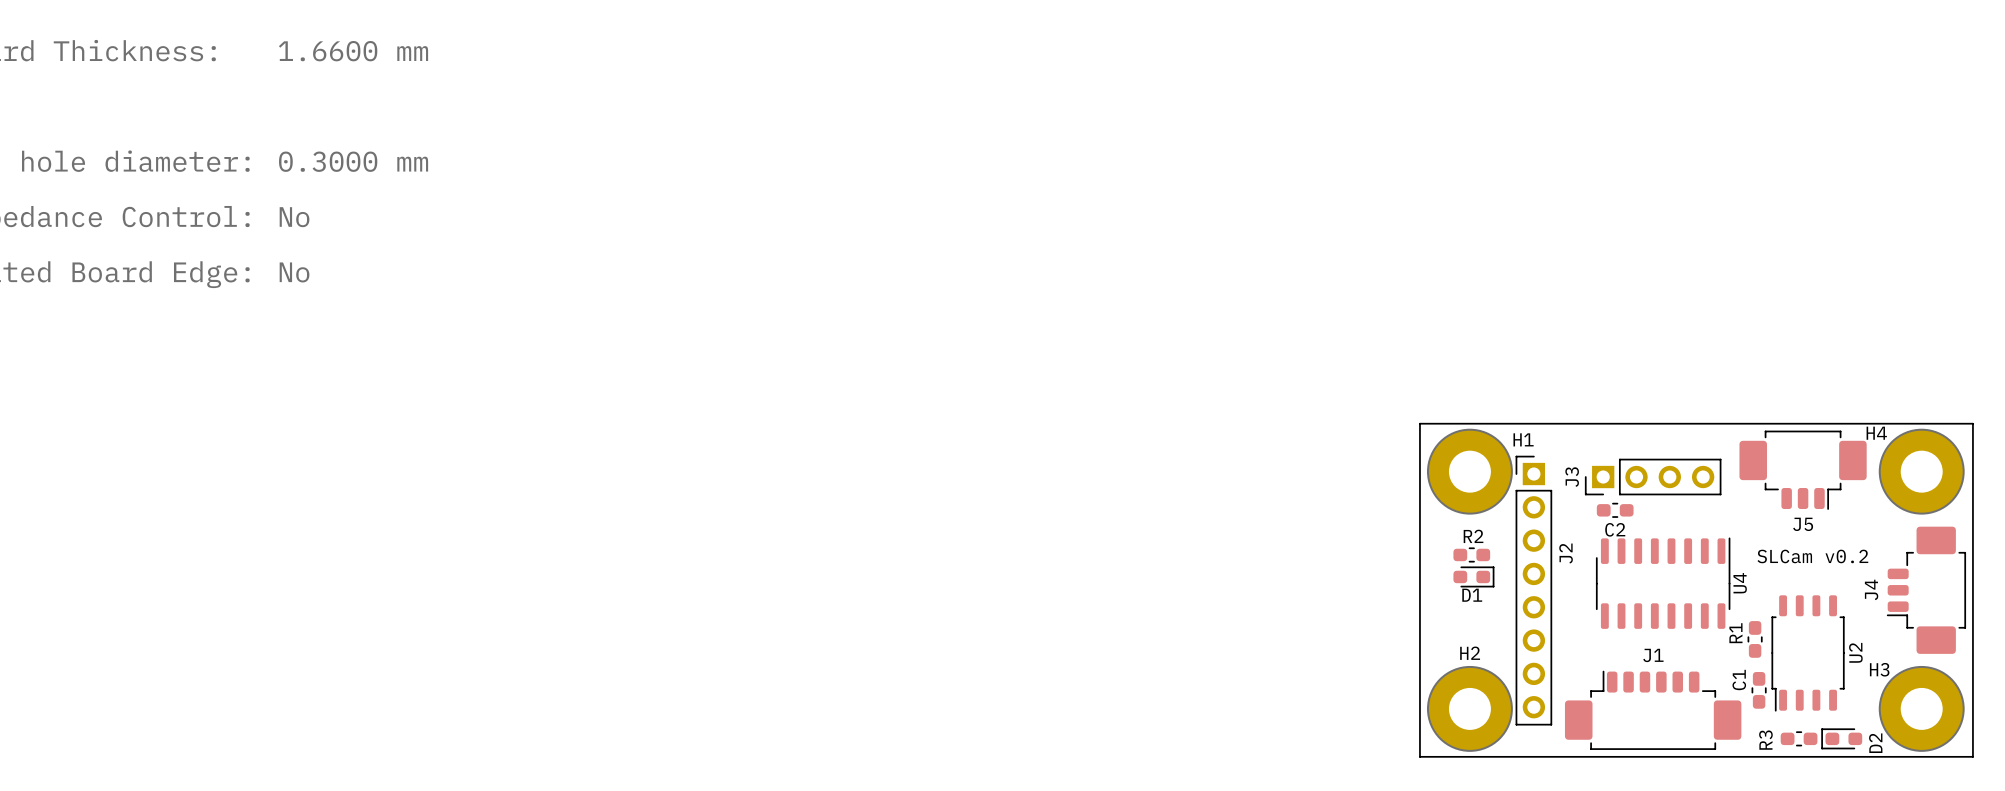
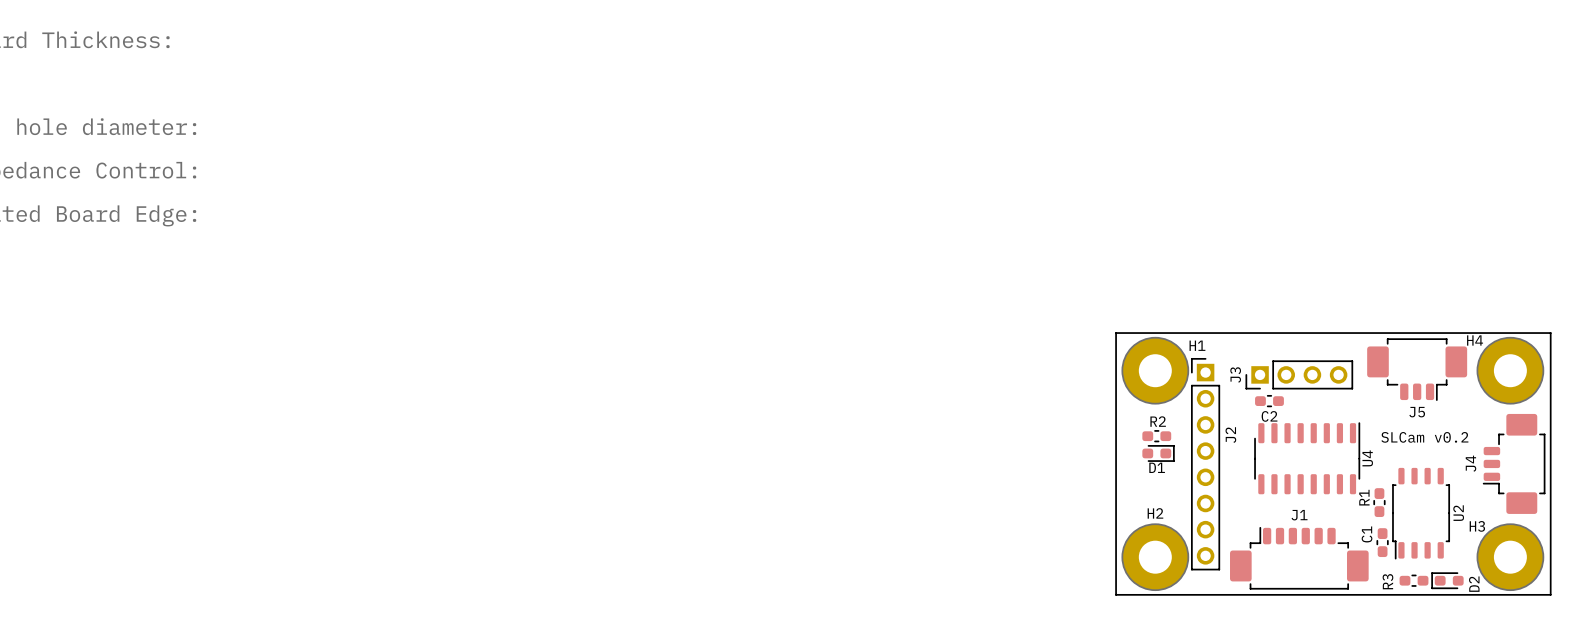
text: 1.6600 mm (353, 51) -> none
text: 0.3000 mm (353, 161) -> none
text: No (294, 217) -> none
text: No (294, 272) -> none

